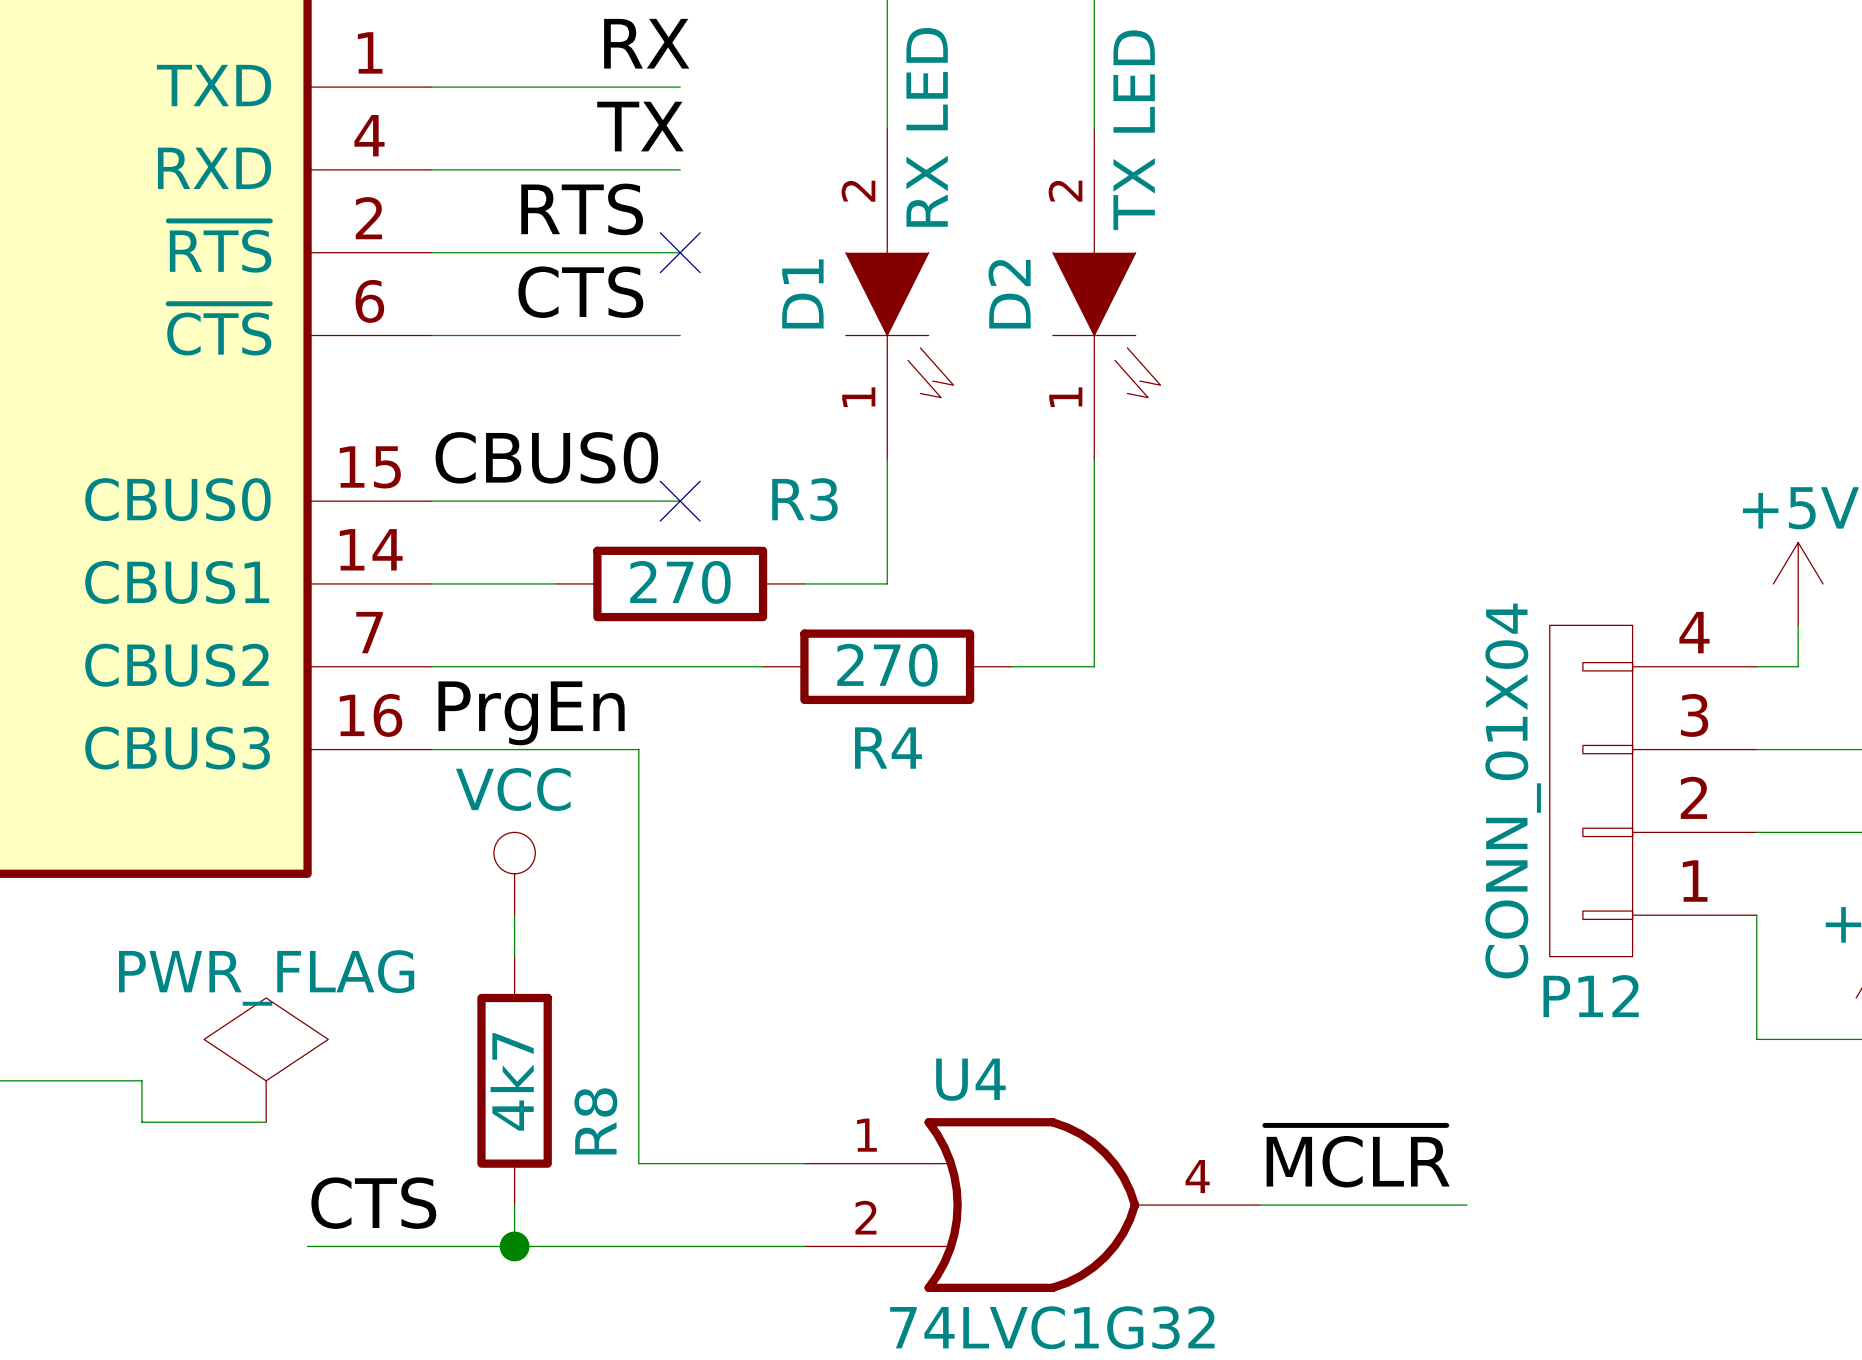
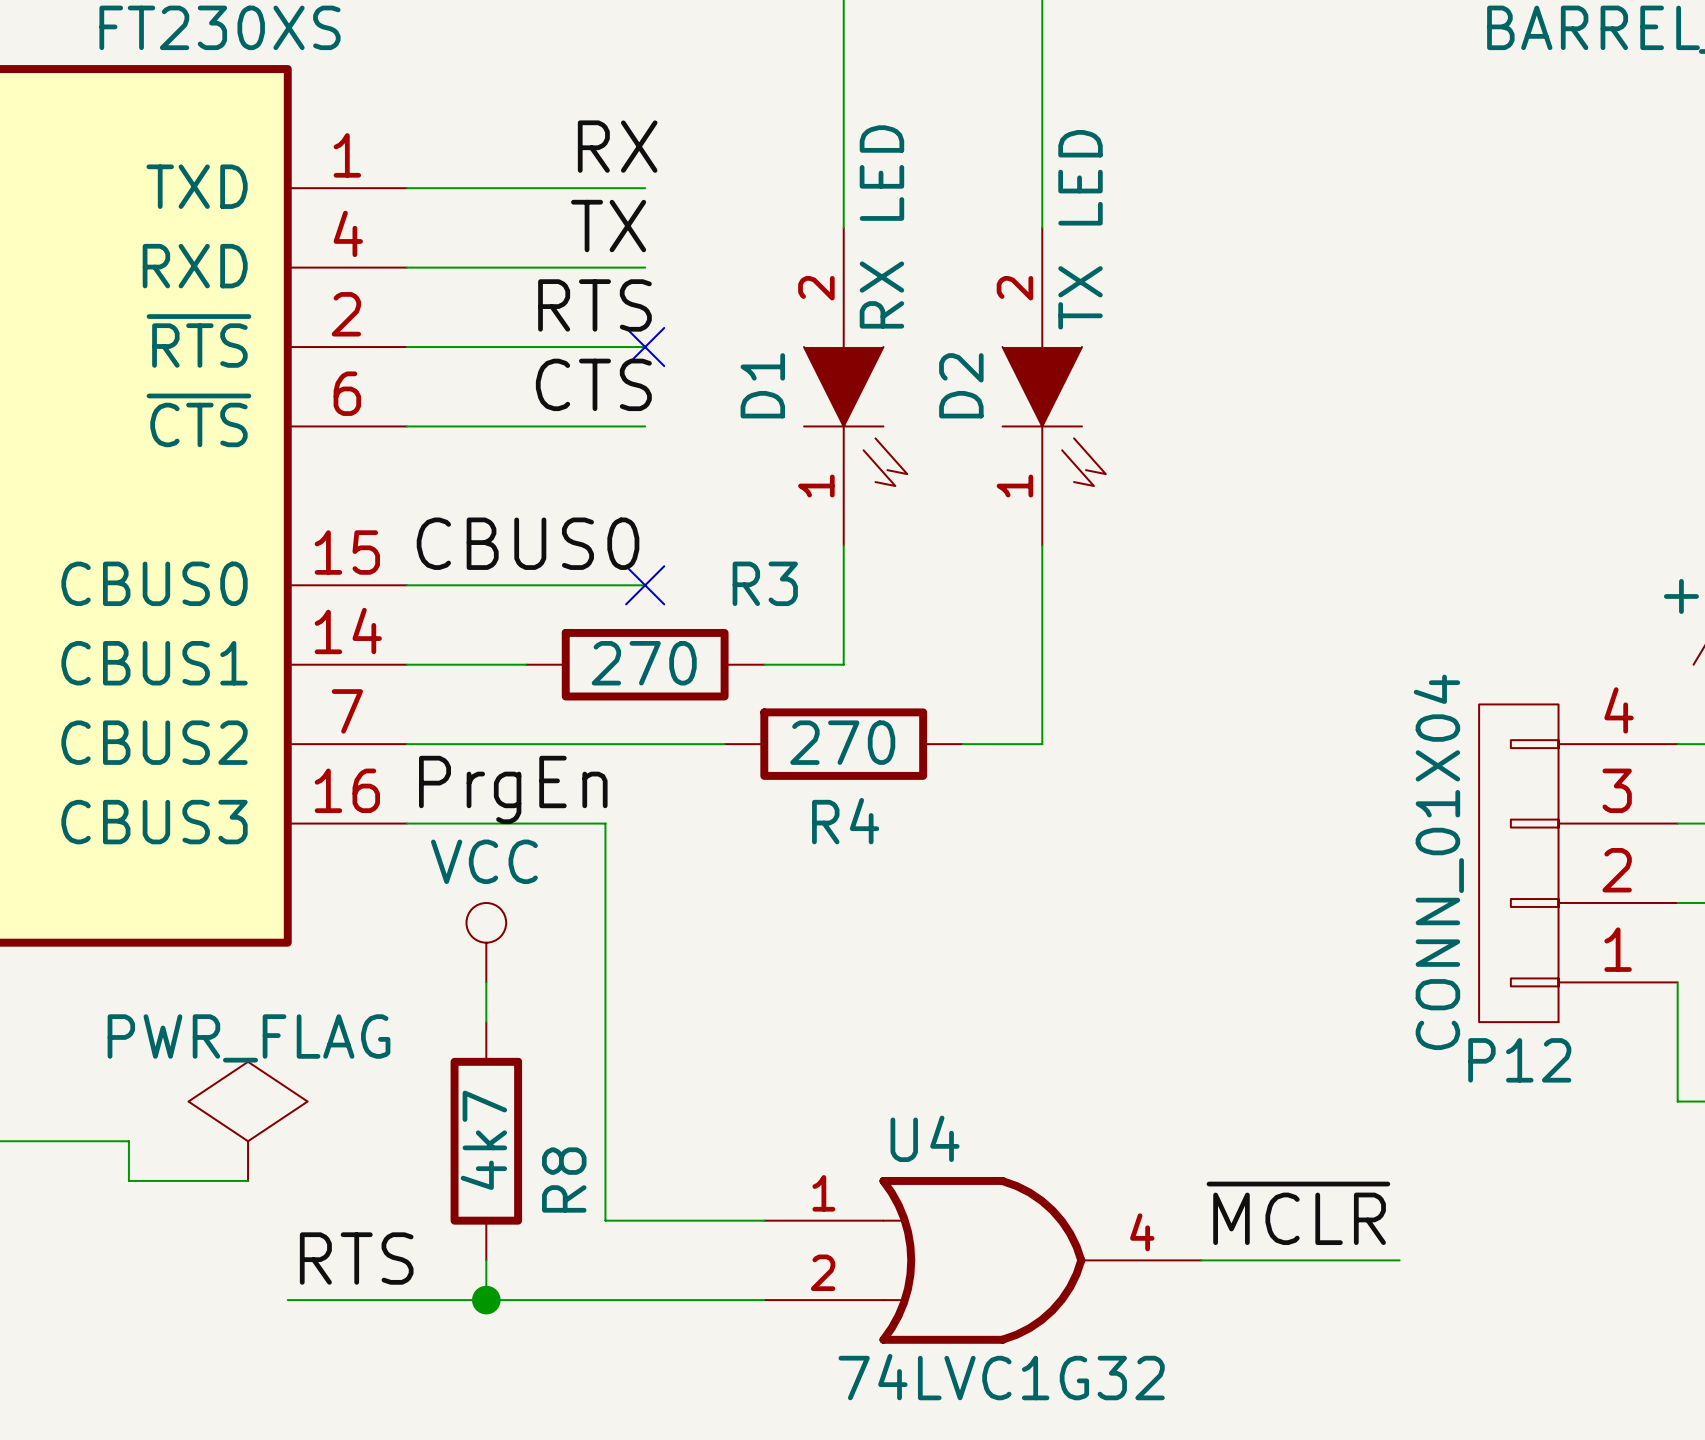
label position: RTS (582, 209) -> RTS (594, 305)
label position: CTS (580, 292) -> CTS (593, 384)
label: CTS (373, 1203) -> RTS (356, 1258)

